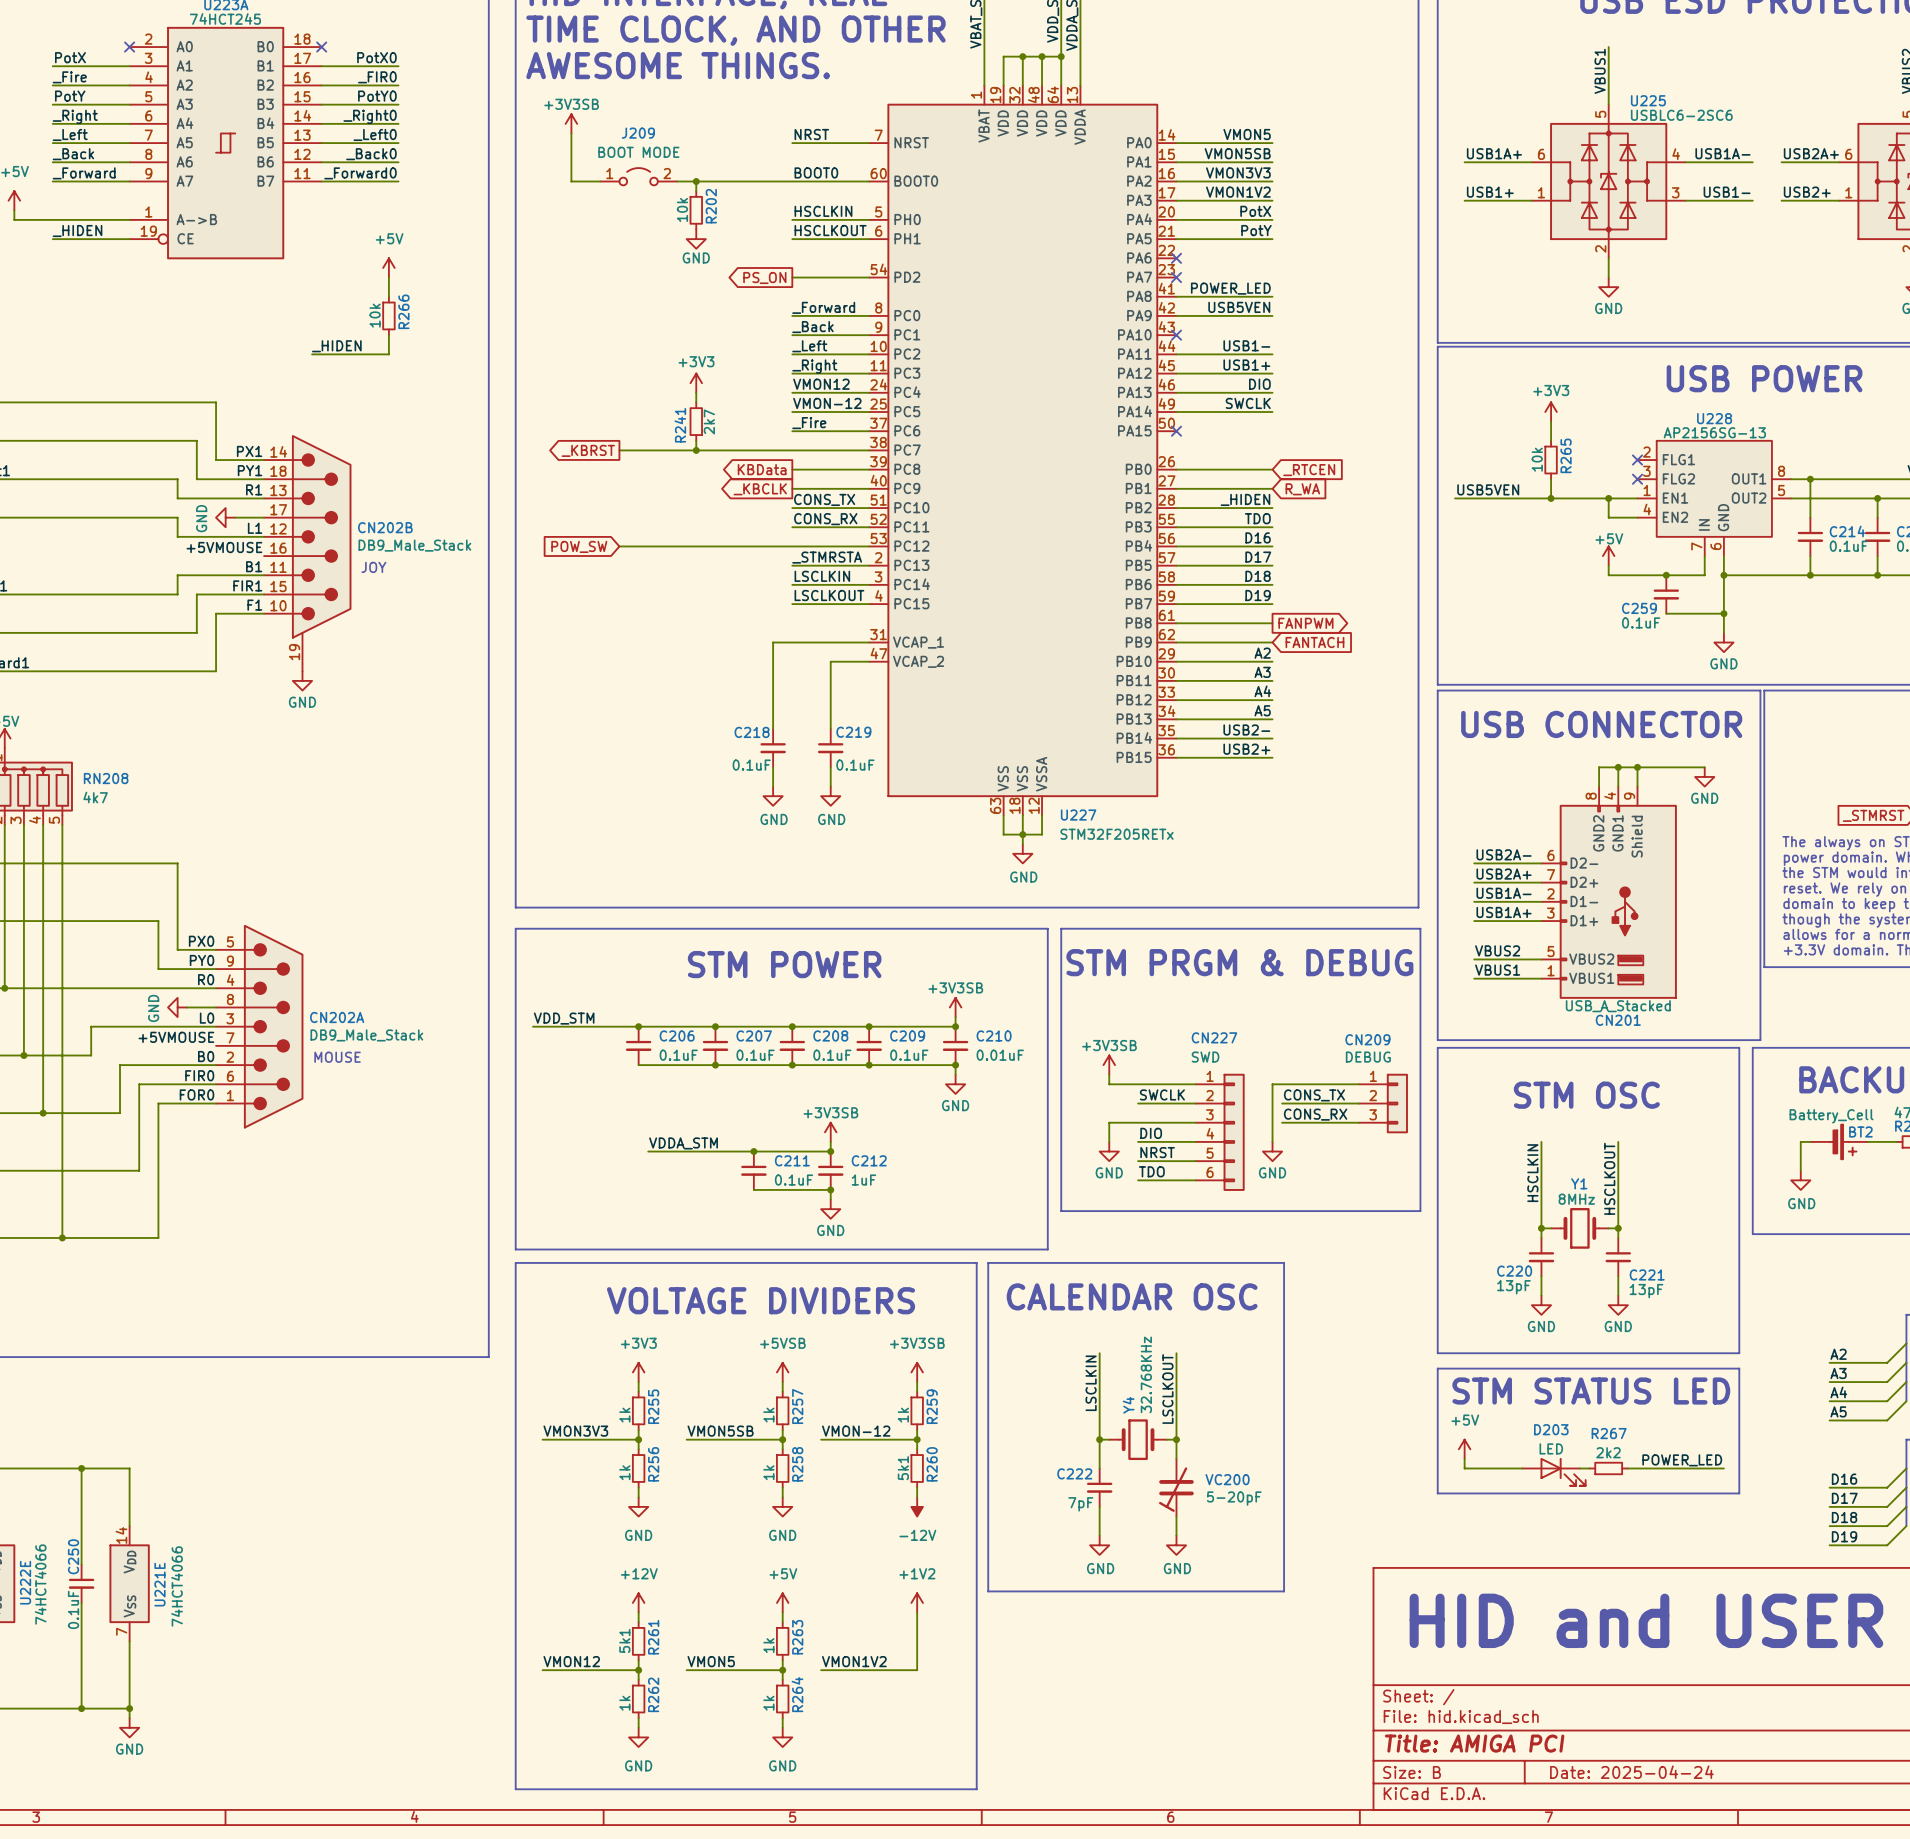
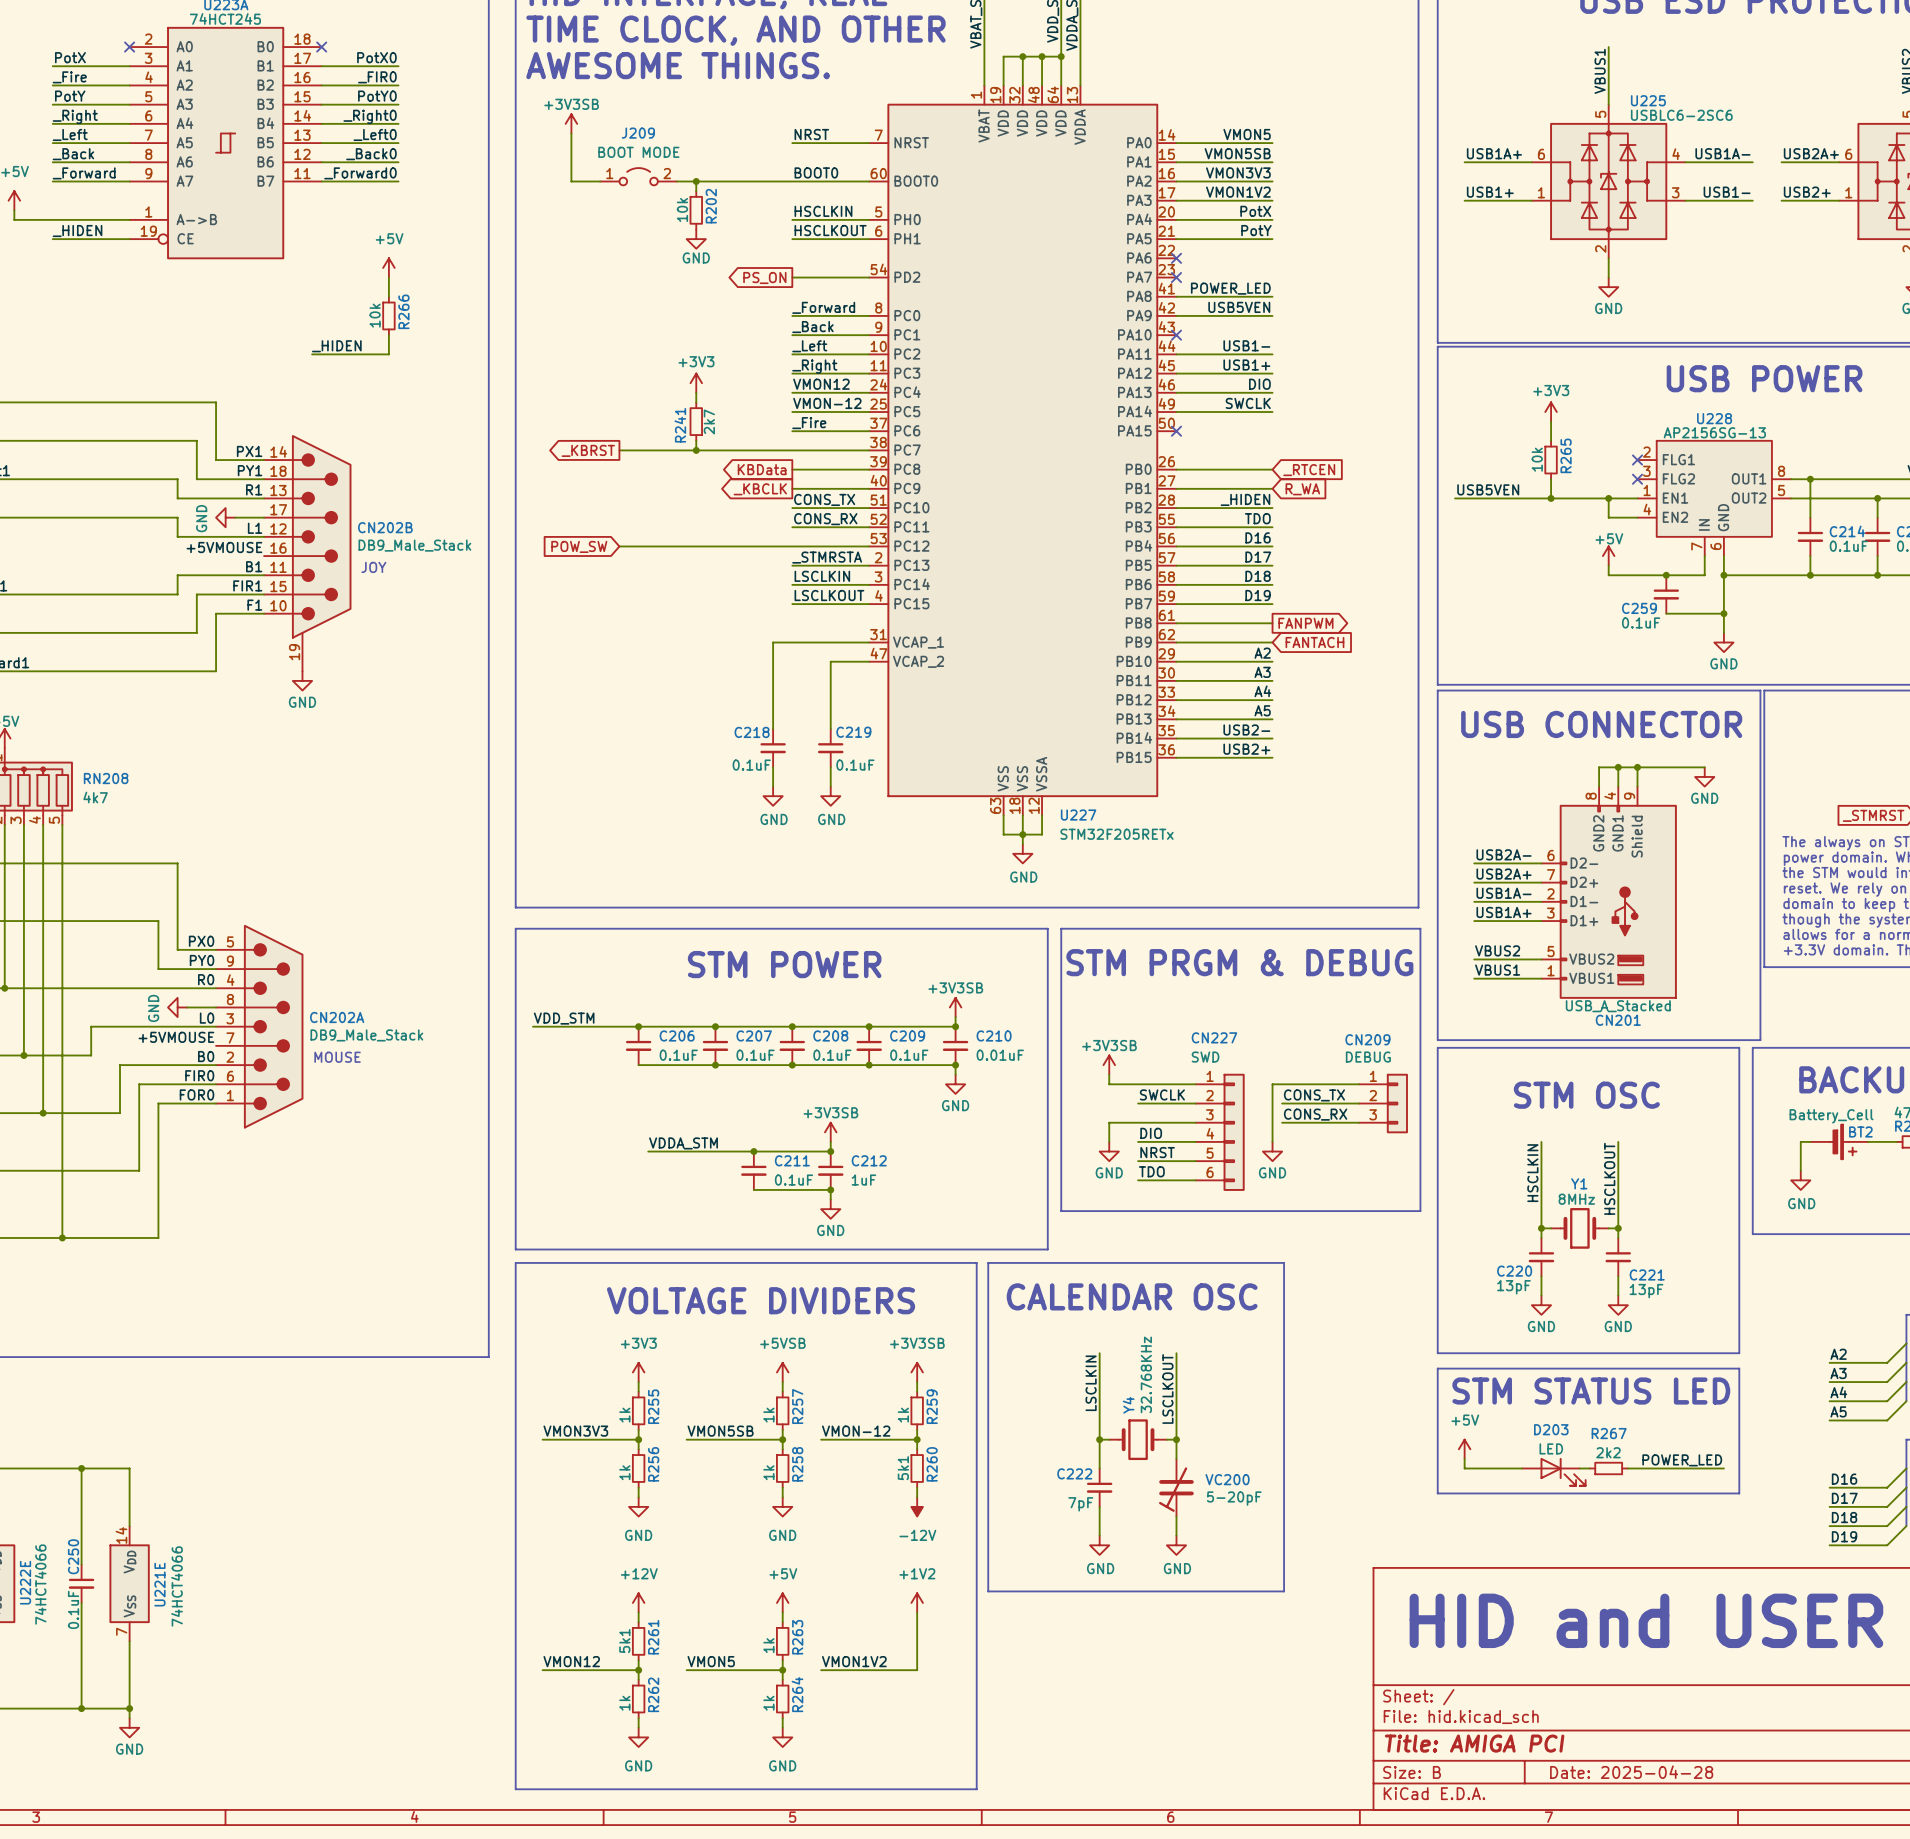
title block: Date: 2025-04-24 (1631, 1772) -> Date: 2025-04-28 (1631, 1772)

